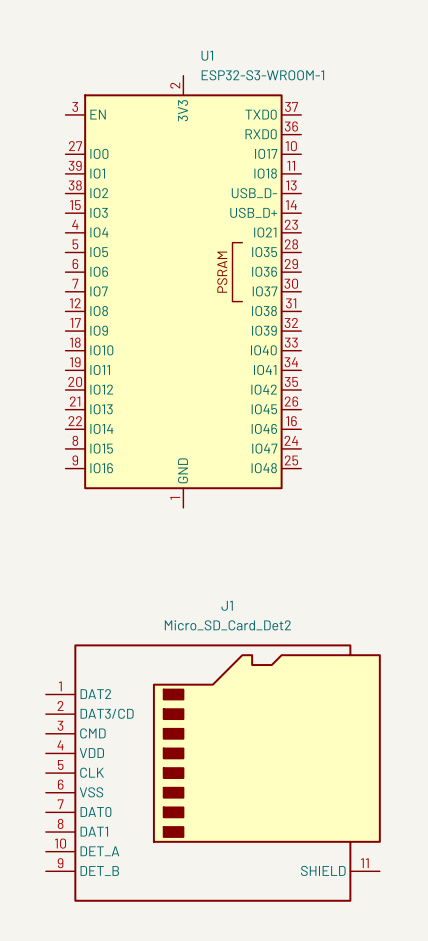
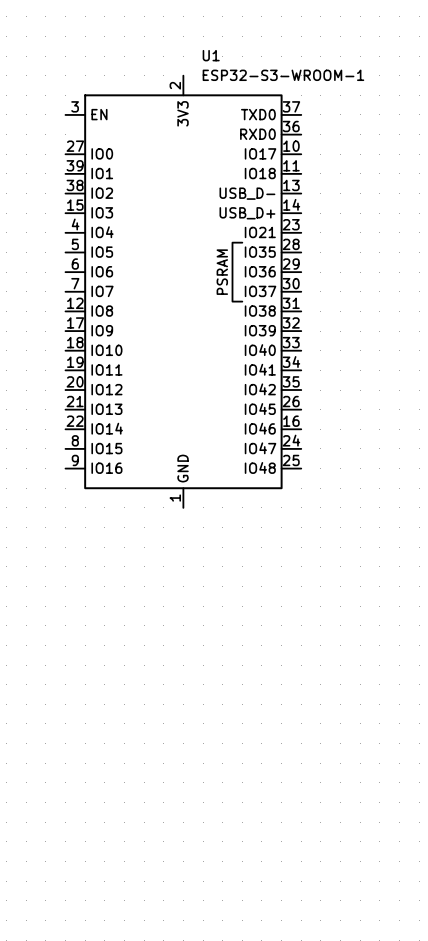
J1: Micro_SD_Card_Det2 (213, 773) -> none

